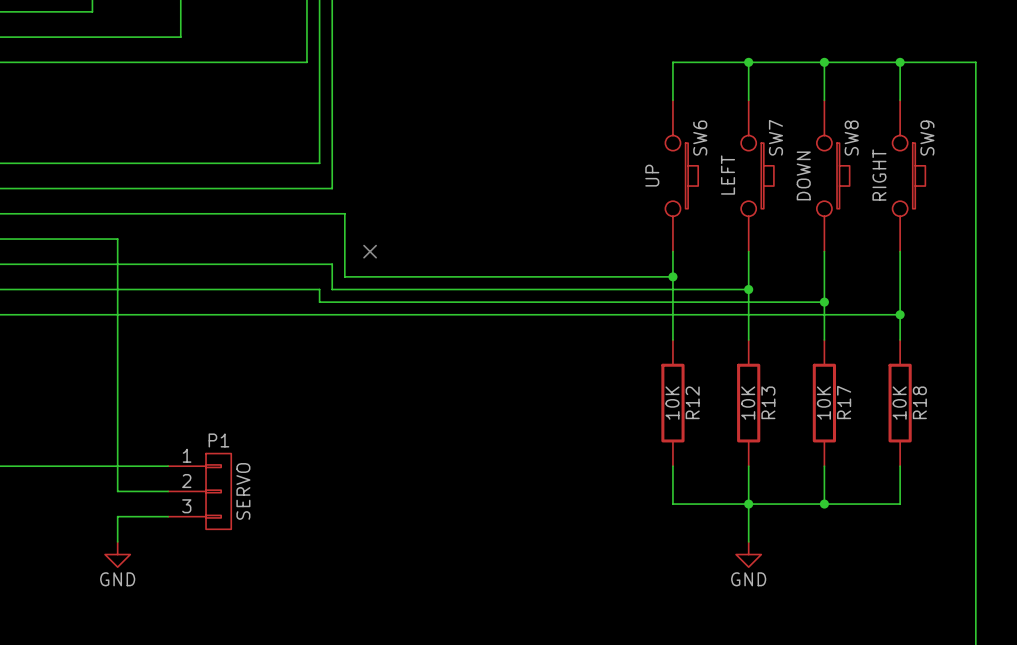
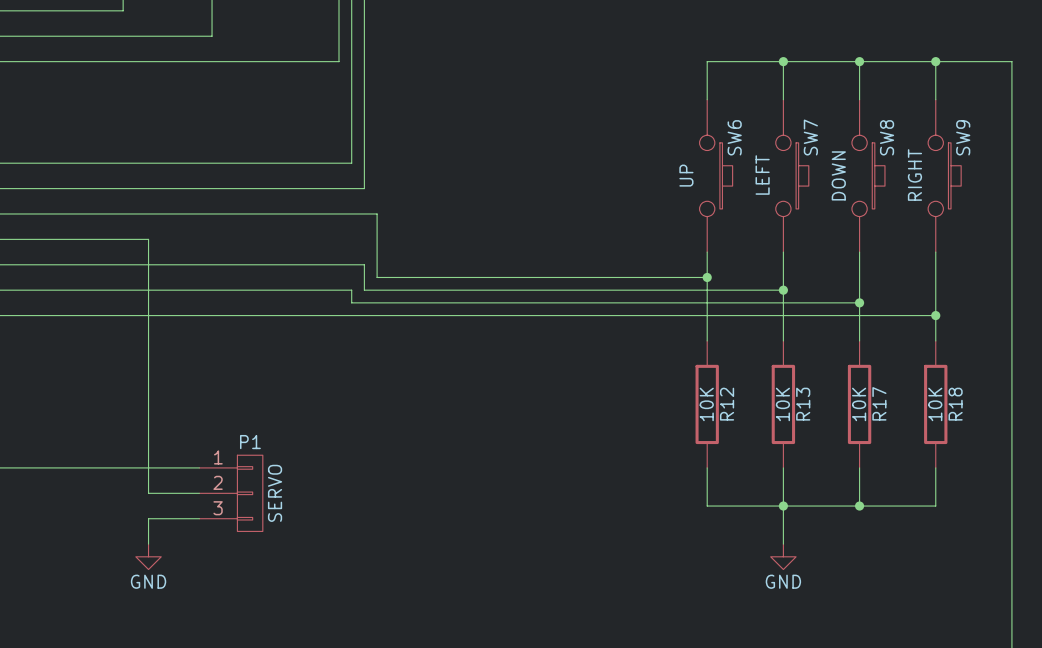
no-connect mark: (370, 251) -> none

